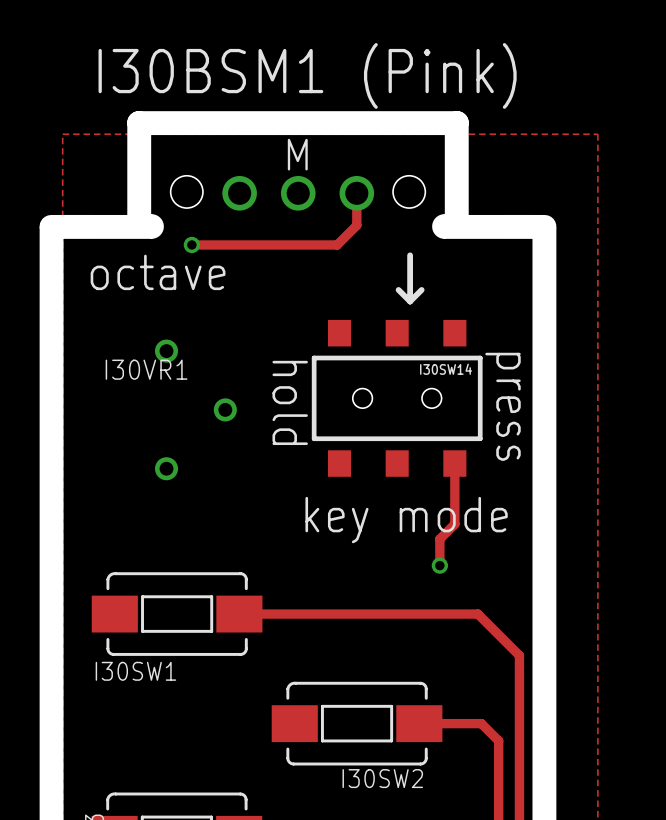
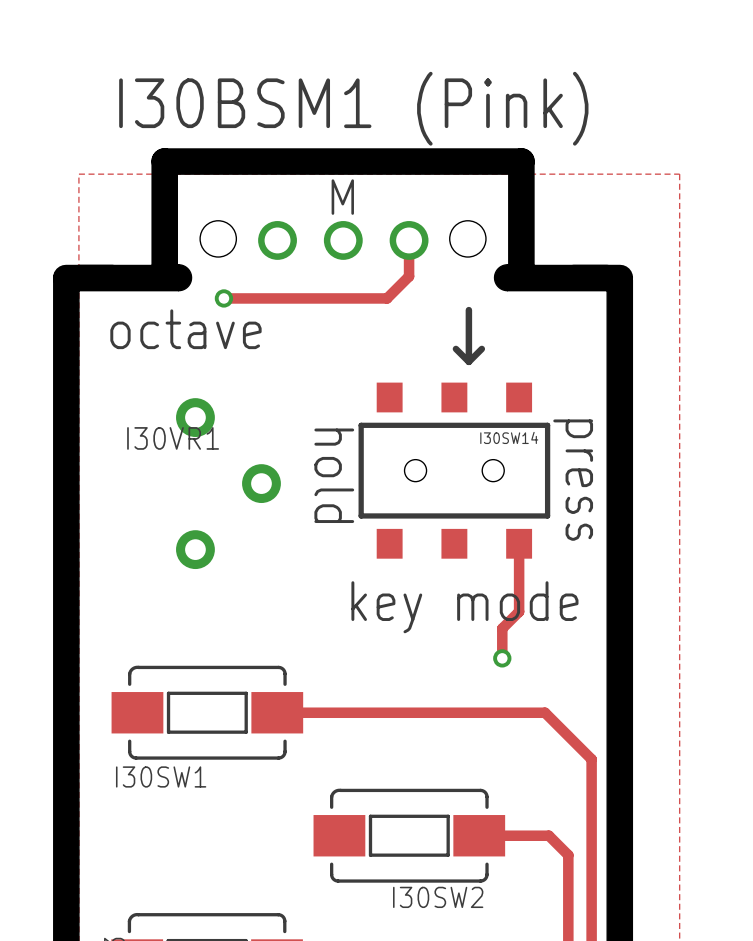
I30VR1 footprint: [154, 339, 237, 481] -> [176, 398, 281, 570]

